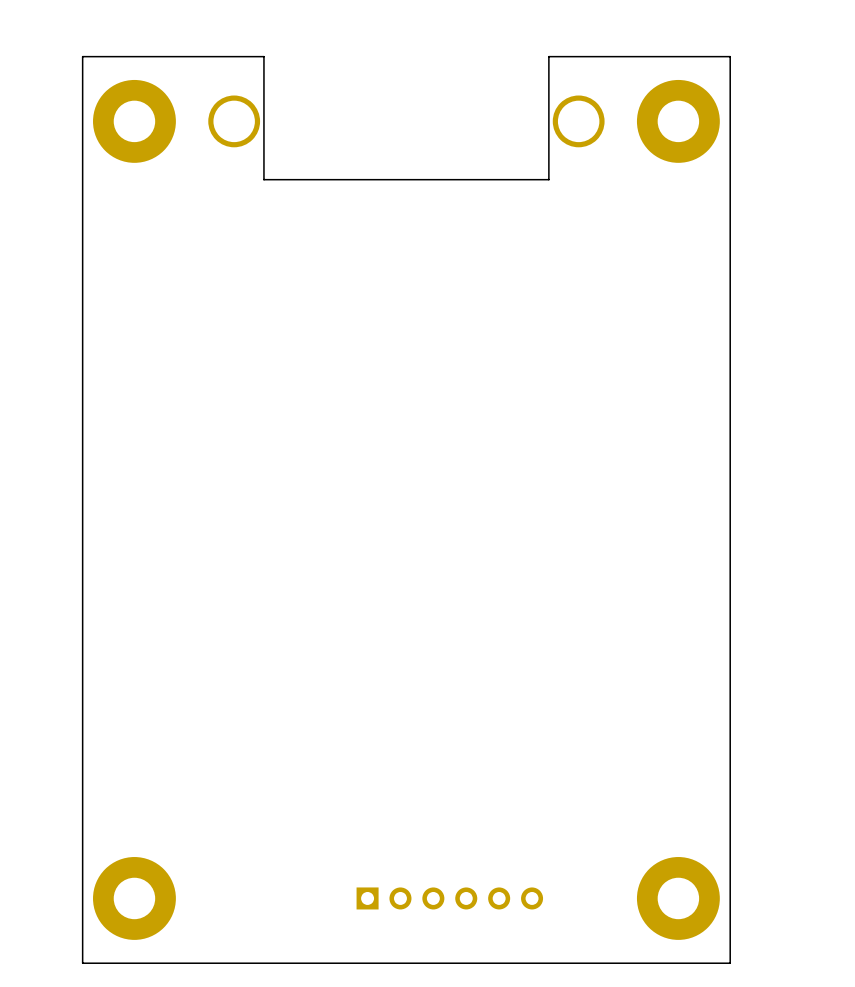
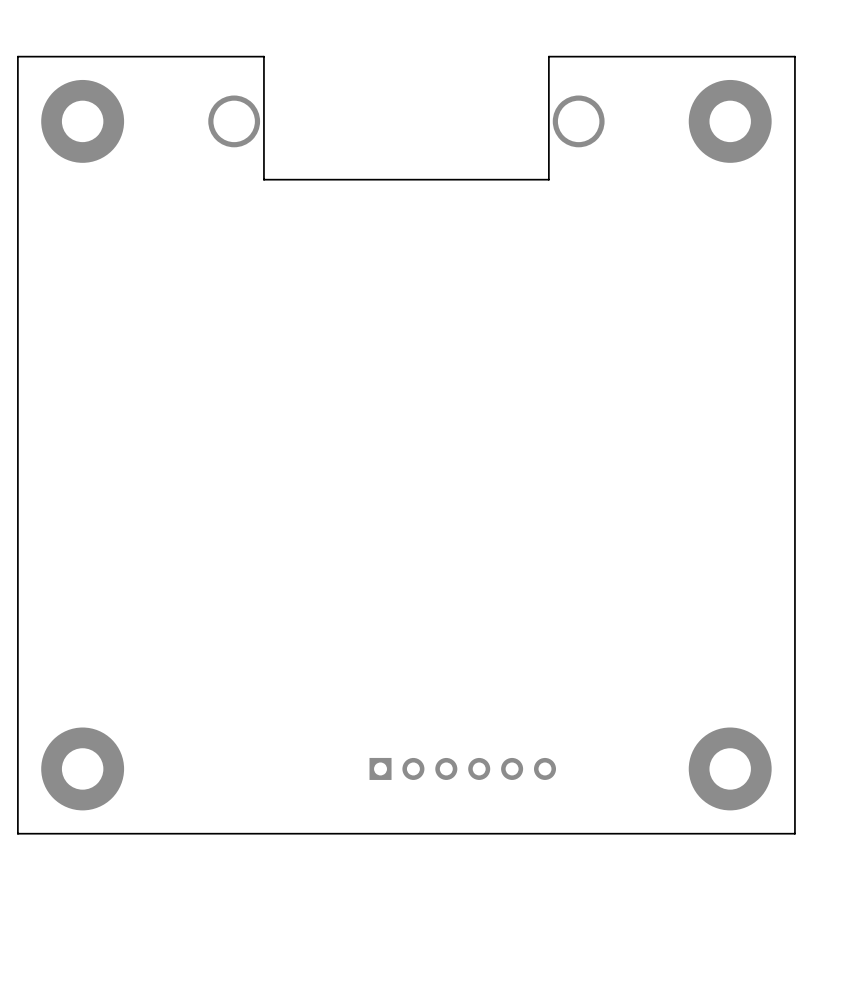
board edge: (730, 56) (730, 963) (82, 963) (82, 56) -> (730, 56) (794, 56) (794, 833) (17, 833) (17, 56) (82, 56)
part position: (134, 121) -> (82, 121)
part position: (678, 121) -> (730, 121)
part position: (134, 898) -> (82, 768)
part position: (449, 898) -> (462, 768)
part position: (678, 898) -> (730, 768)

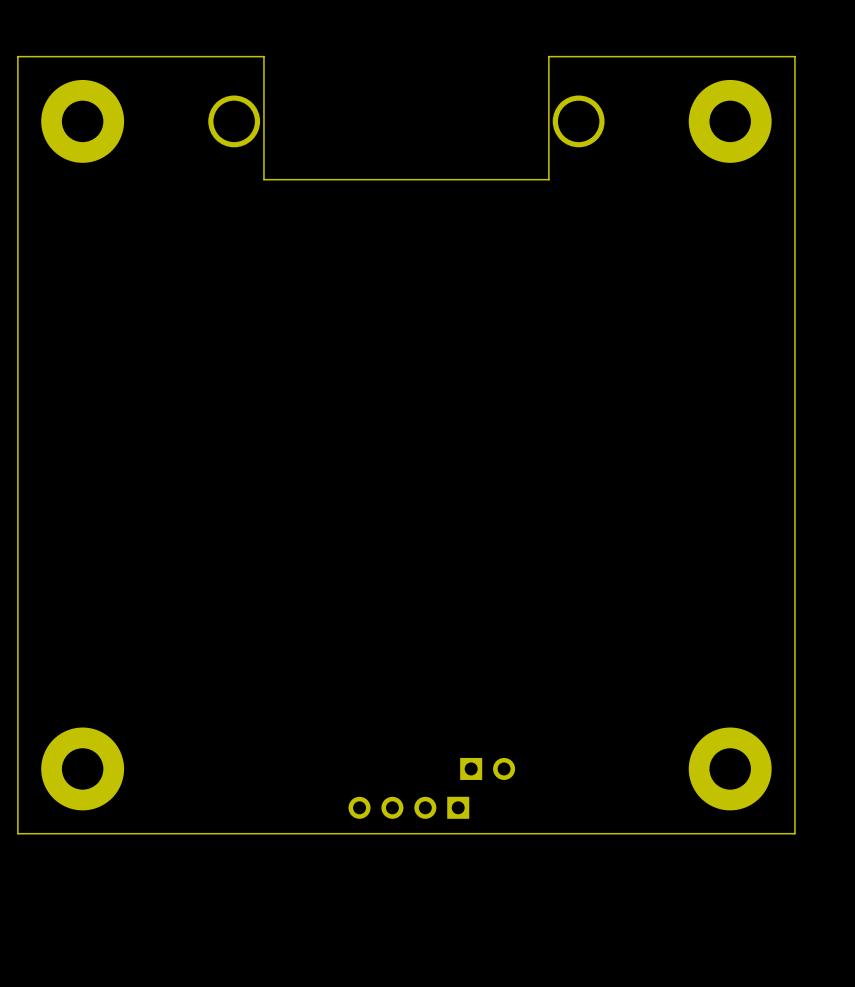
part: (462, 768) -> none
part: none -> (487, 768)
part: none -> (408, 807)

